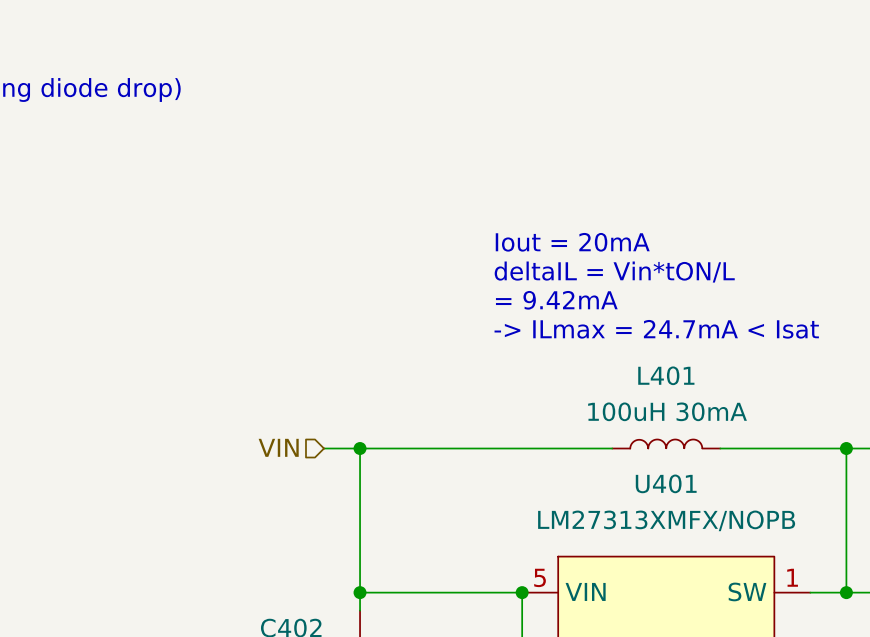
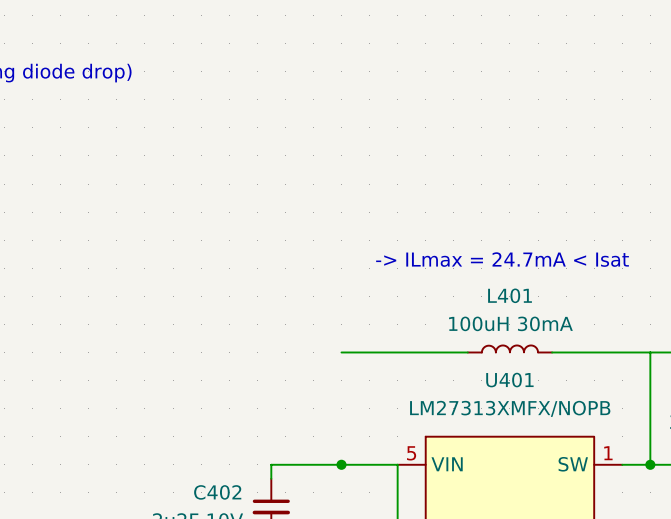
text: Iout = 20mA (572, 242) -> none
text: deltaIL = Vin*tON/L (614, 272) -> none
text: = 9.42mA (556, 300) -> none
hierarchical label: VIN (278, 447) -> none
wire: (324, 448) (450, 448) -> none
wire: (360, 448) (360, 592) -> none
junction: (360, 448) -> none
junction: (846, 448) -> none
junction: (360, 592) -> none
junction: none -> (341, 464)
junction: (522, 592) -> none

